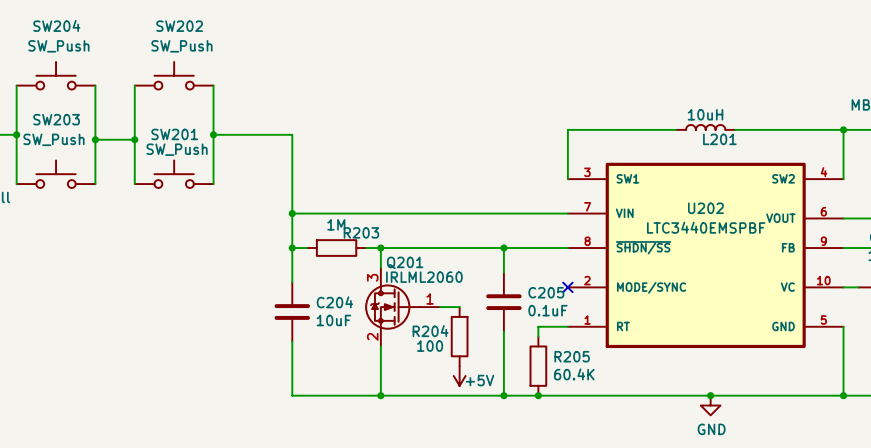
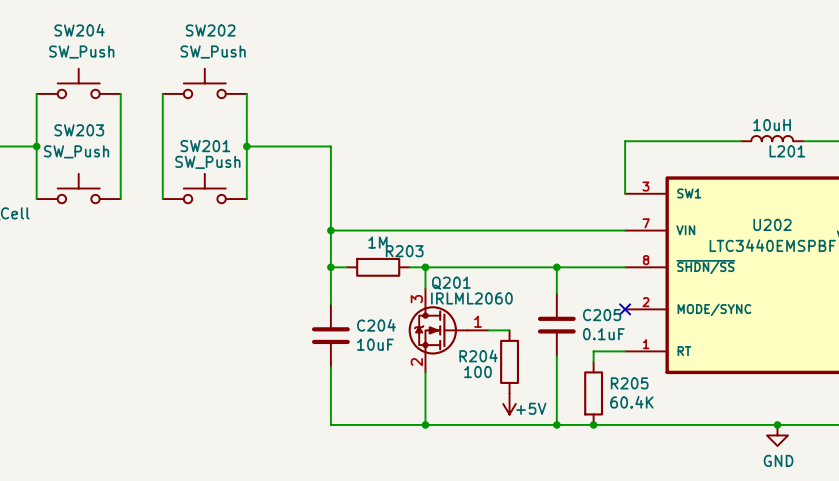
wire: (95, 139) (134, 139) -> none
junction: (95, 139) -> none
junction: (134, 139) -> none

